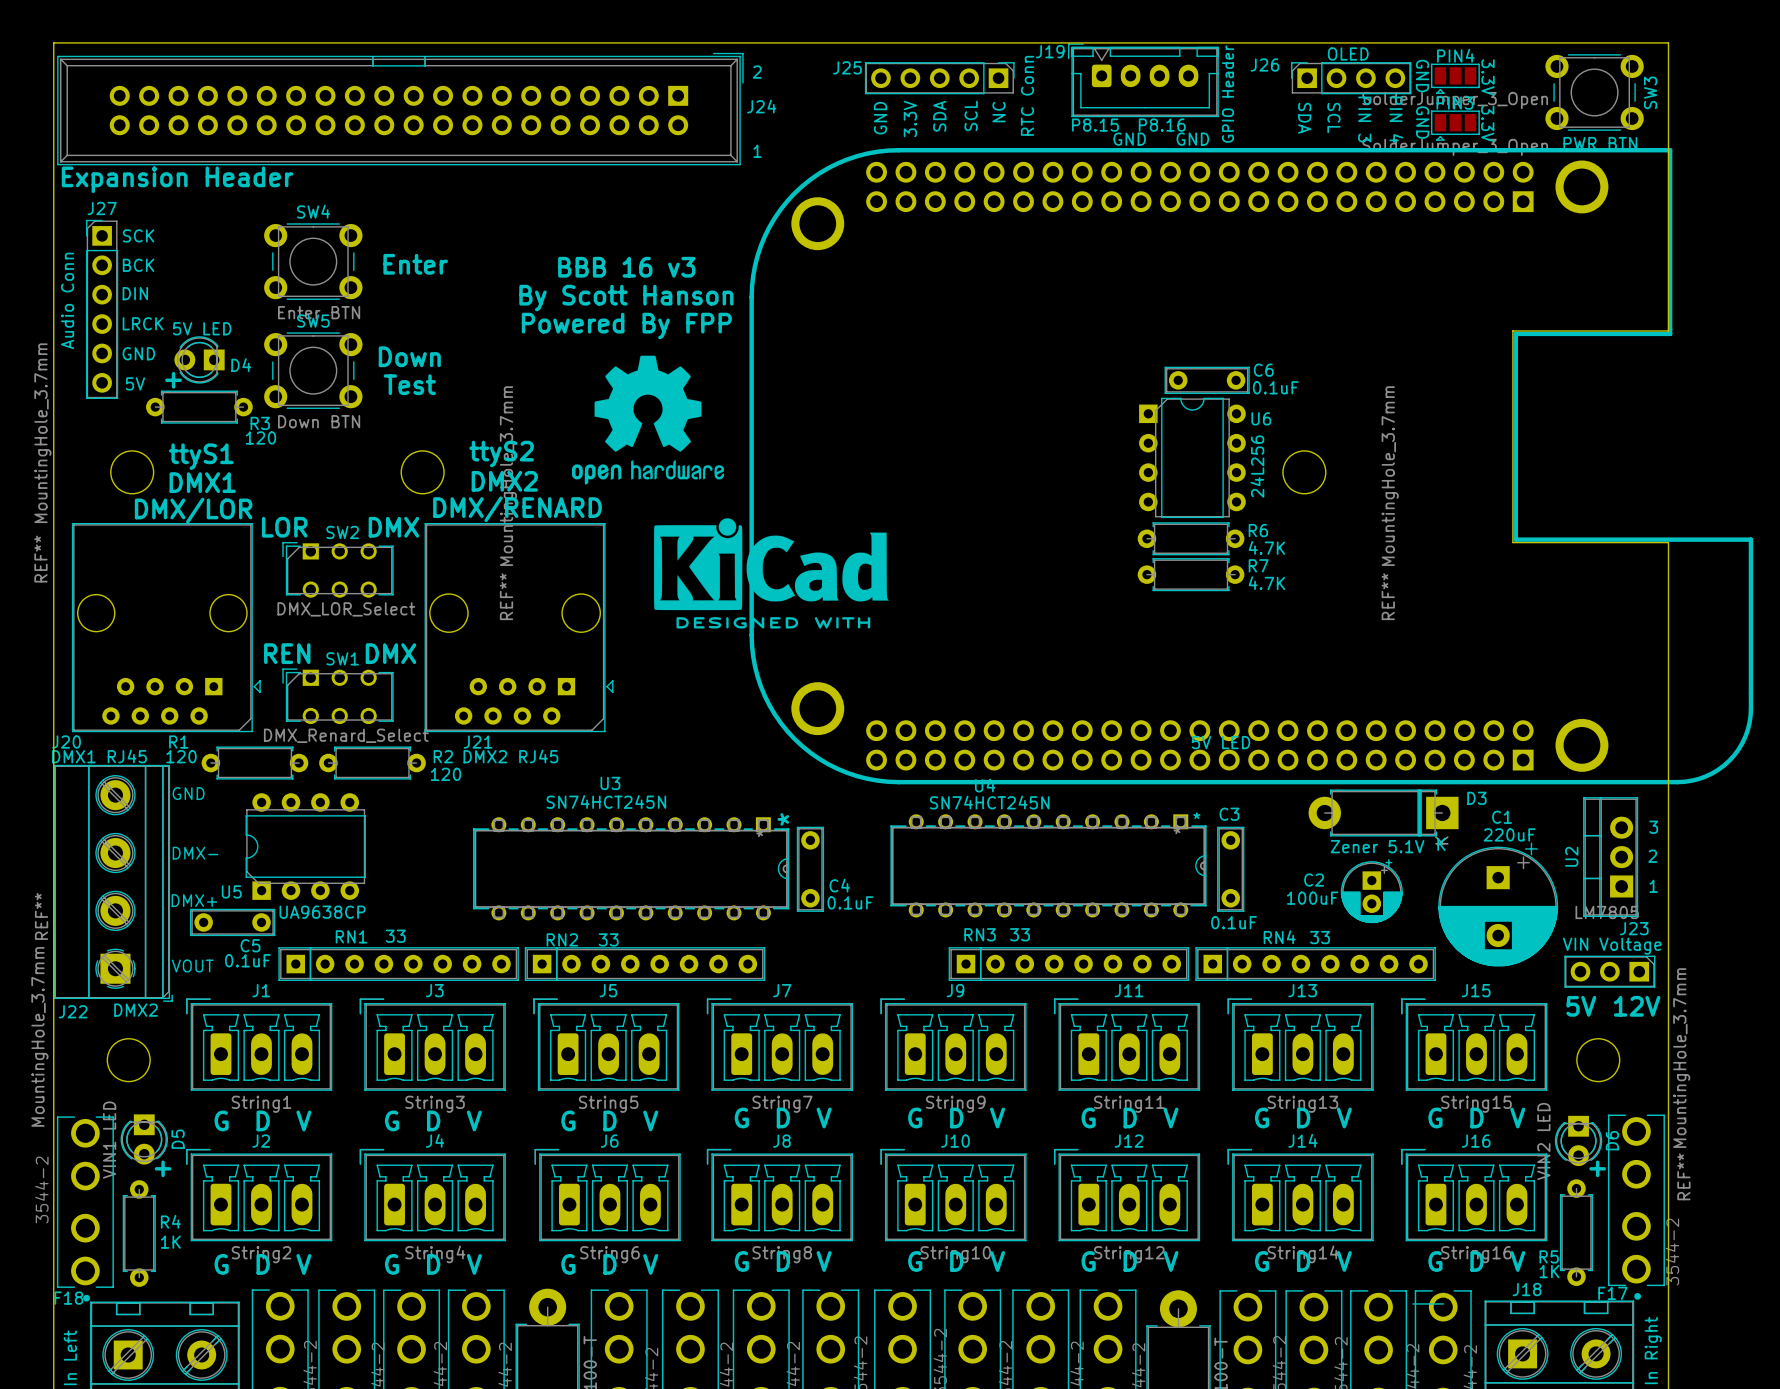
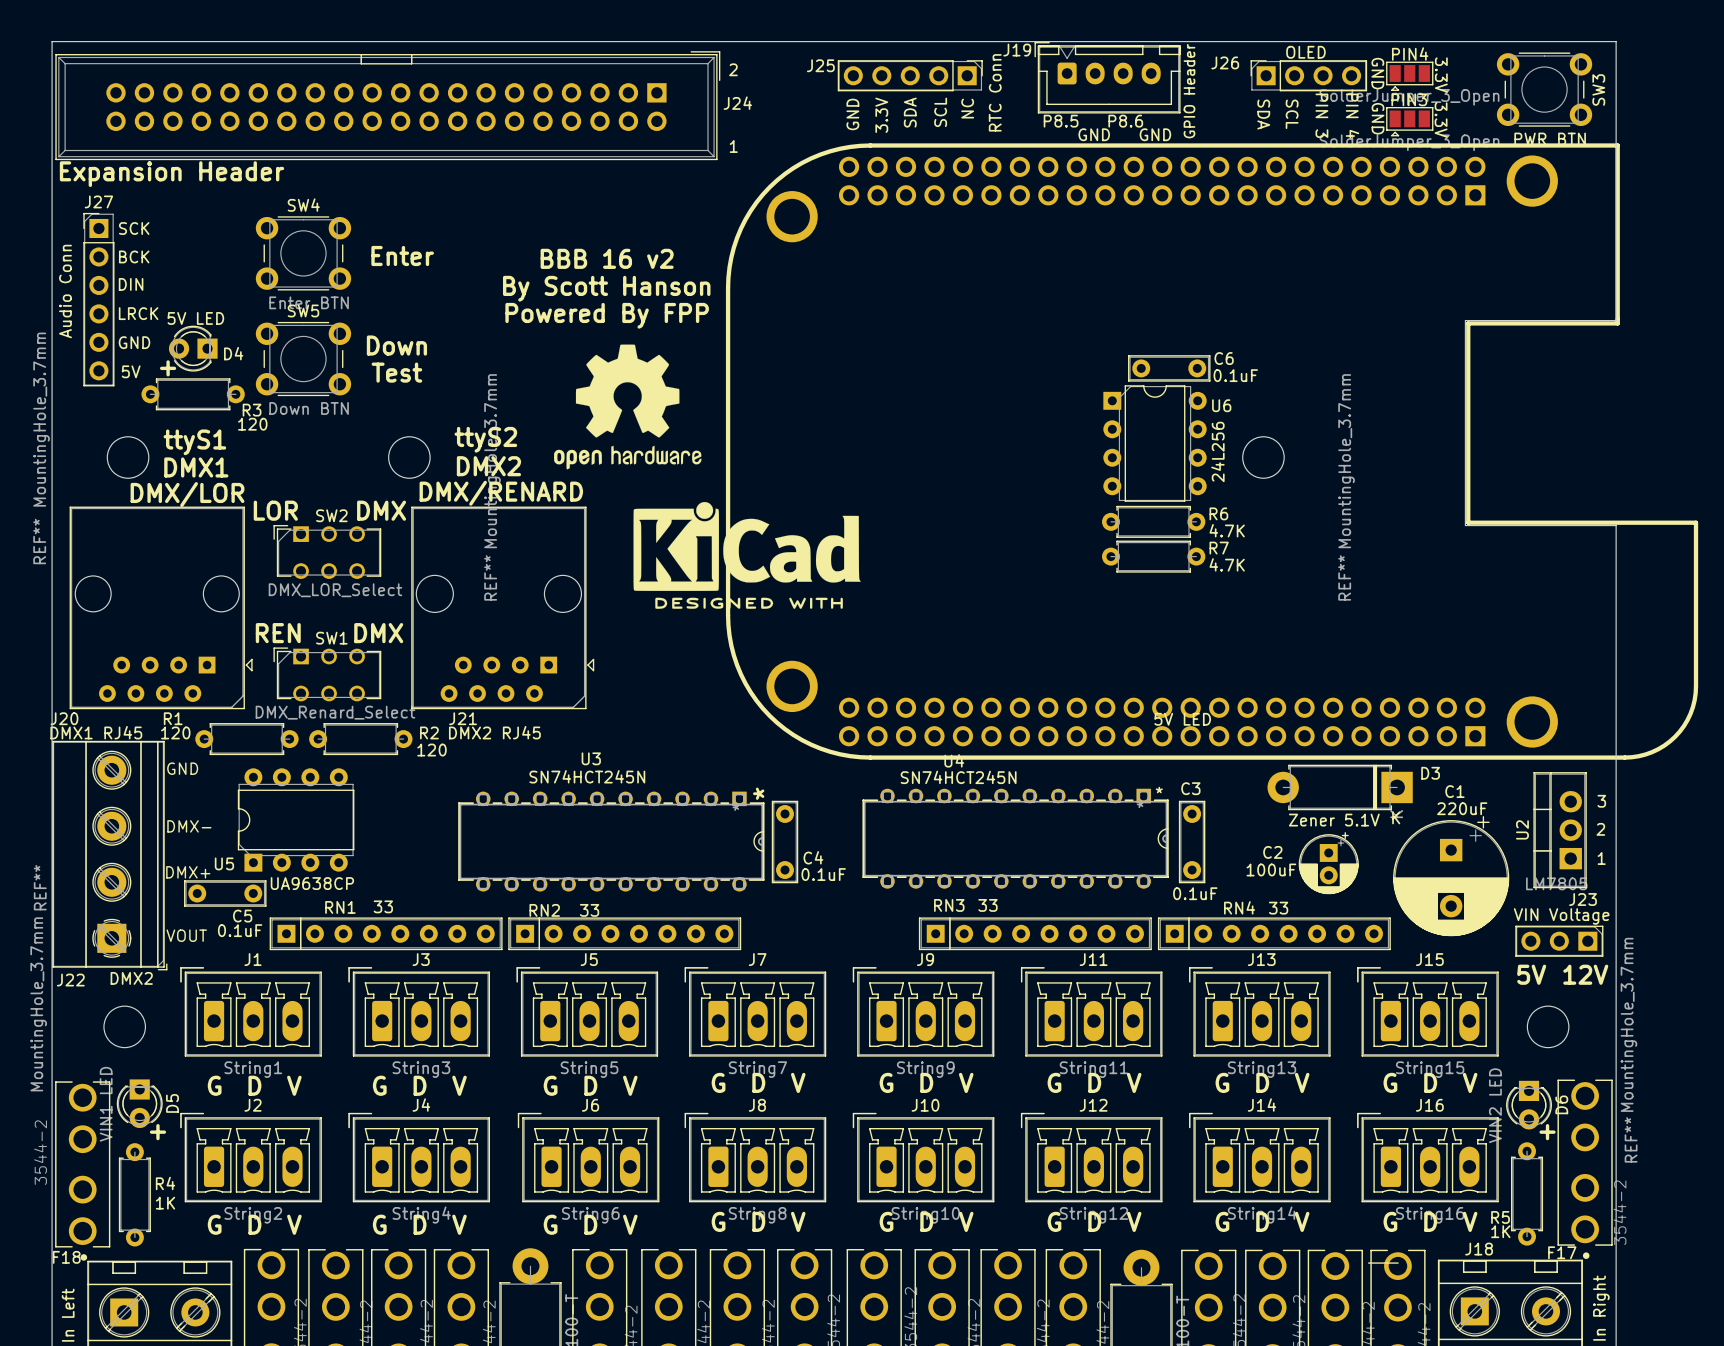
text: P8.15 (1095, 125) -> P8.5 (1061, 121)
text: P8.16 (1162, 125) -> P8.6 (1125, 121)
text: BBB 16 v3 (626, 267) -> BBB 16 v2 (607, 258)

